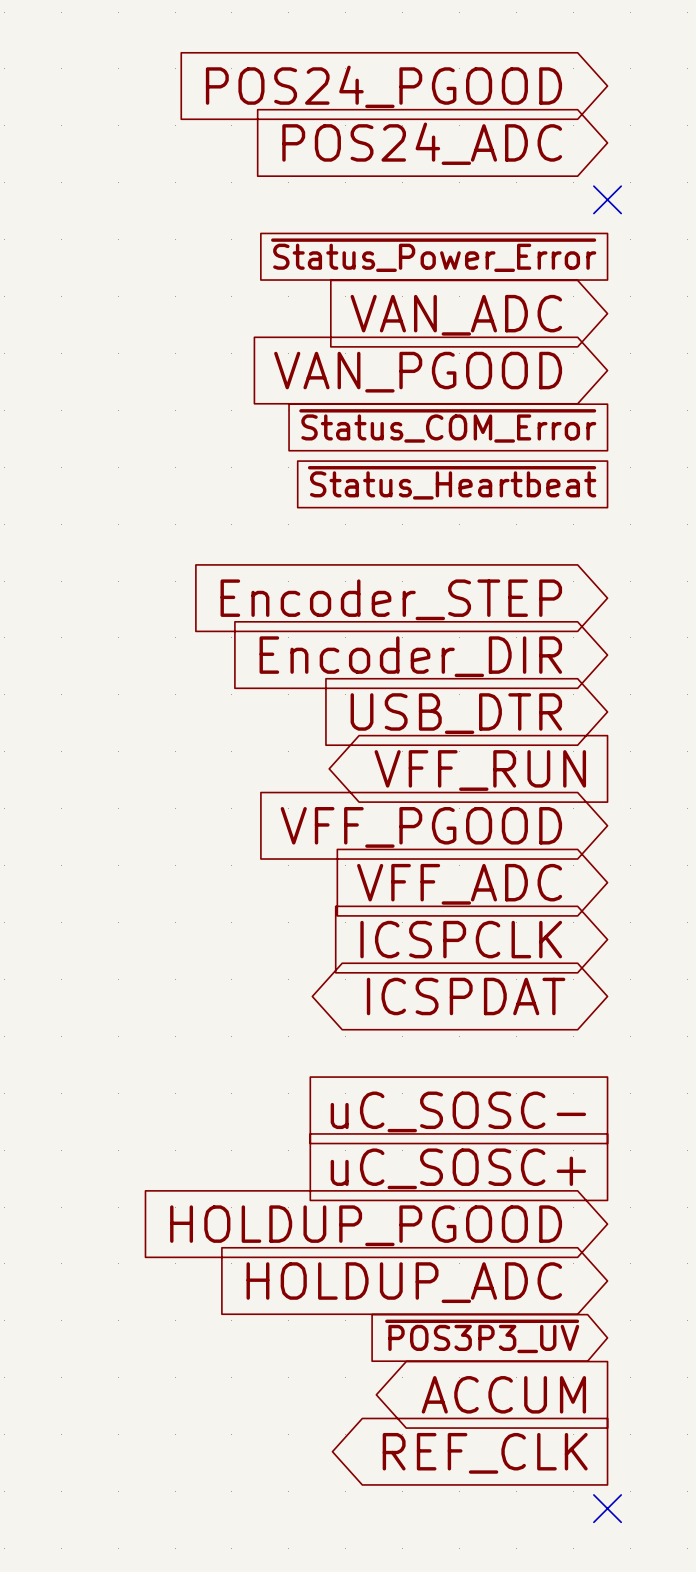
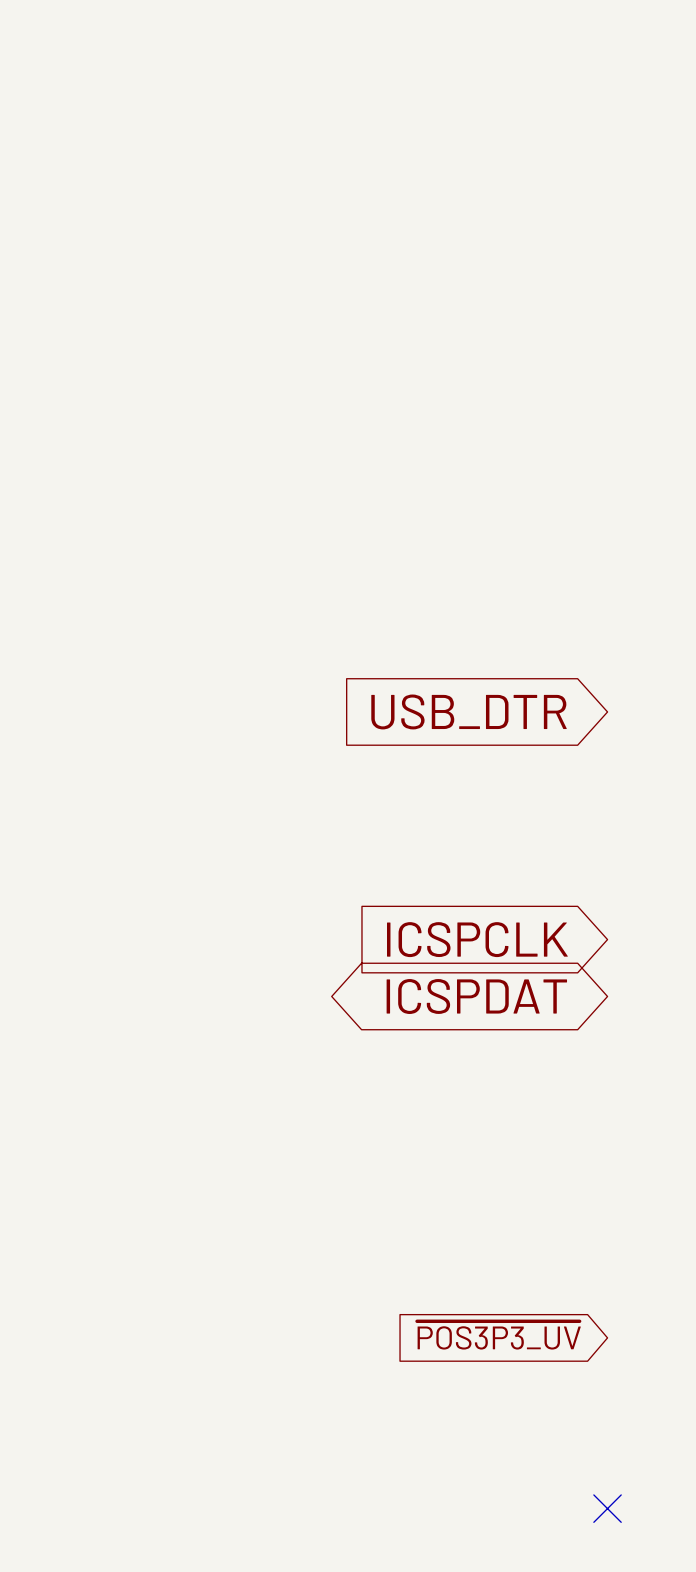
global label: POS24_PGOOD (383, 86) -> none
global label: POS24_ADC (422, 143) -> none
no-connect mark: (607, 199) -> none
global label: ~{Status_Power_Error} (433, 255) -> none
global label: VAN_ADC (456, 315) -> none
global label: VAN_PGOOD (418, 372) -> none
global label: ~{Status_COM_Error} (447, 425) -> none
global label: ~{Status_Heartbeat} (452, 482) -> none
global label: Encoder_STEP (391, 599) -> none
global label: Encoder_DIR (410, 656) -> none
global label: VFF_RUN (480, 770) -> none
global label: VFF_PGOOD (421, 827) -> none
global label: VFF_ADC (459, 884) -> none
global label: uC_SOSC- (458, 1111) -> none
global label: uC_SOSC+ (458, 1168) -> none
global label: HOLDUP_PGOOD (366, 1225) -> none
global label: HOLDUP_ADC (404, 1282) -> none
global label: ACCUM (503, 1394) -> none
global label: REF_CLK (485, 1453) -> none

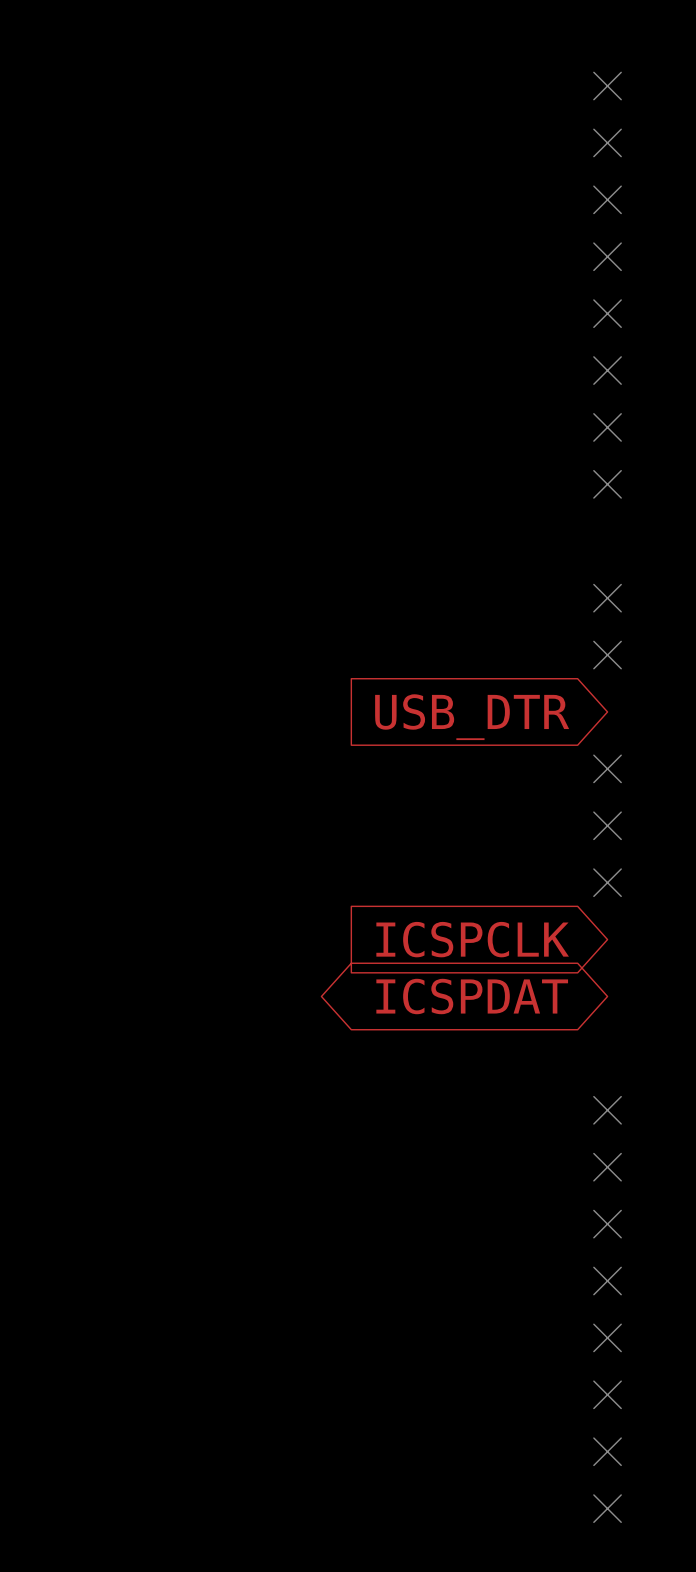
no-connect mark: none -> (607, 86)
no-connect mark: none -> (607, 142)
no-connect mark: none -> (607, 199)
no-connect mark: none -> (607, 256)
no-connect mark: none -> (607, 313)
no-connect mark: none -> (607, 370)
no-connect mark: none -> (607, 427)
no-connect mark: none -> (607, 484)
no-connect mark: none -> (607, 598)
no-connect mark: none -> (607, 655)
no-connect mark: none -> (607, 768)
no-connect mark: none -> (607, 825)
no-connect mark: none -> (607, 882)
no-connect mark: none -> (607, 1110)
no-connect mark: none -> (607, 1167)
no-connect mark: none -> (607, 1224)
no-connect mark: none -> (607, 1281)
global label: ~{POS3P3_UV} (498, 1335) -> none
no-connect mark: none -> (607, 1337)
no-connect mark: none -> (607, 1394)
no-connect mark: none -> (607, 1451)

